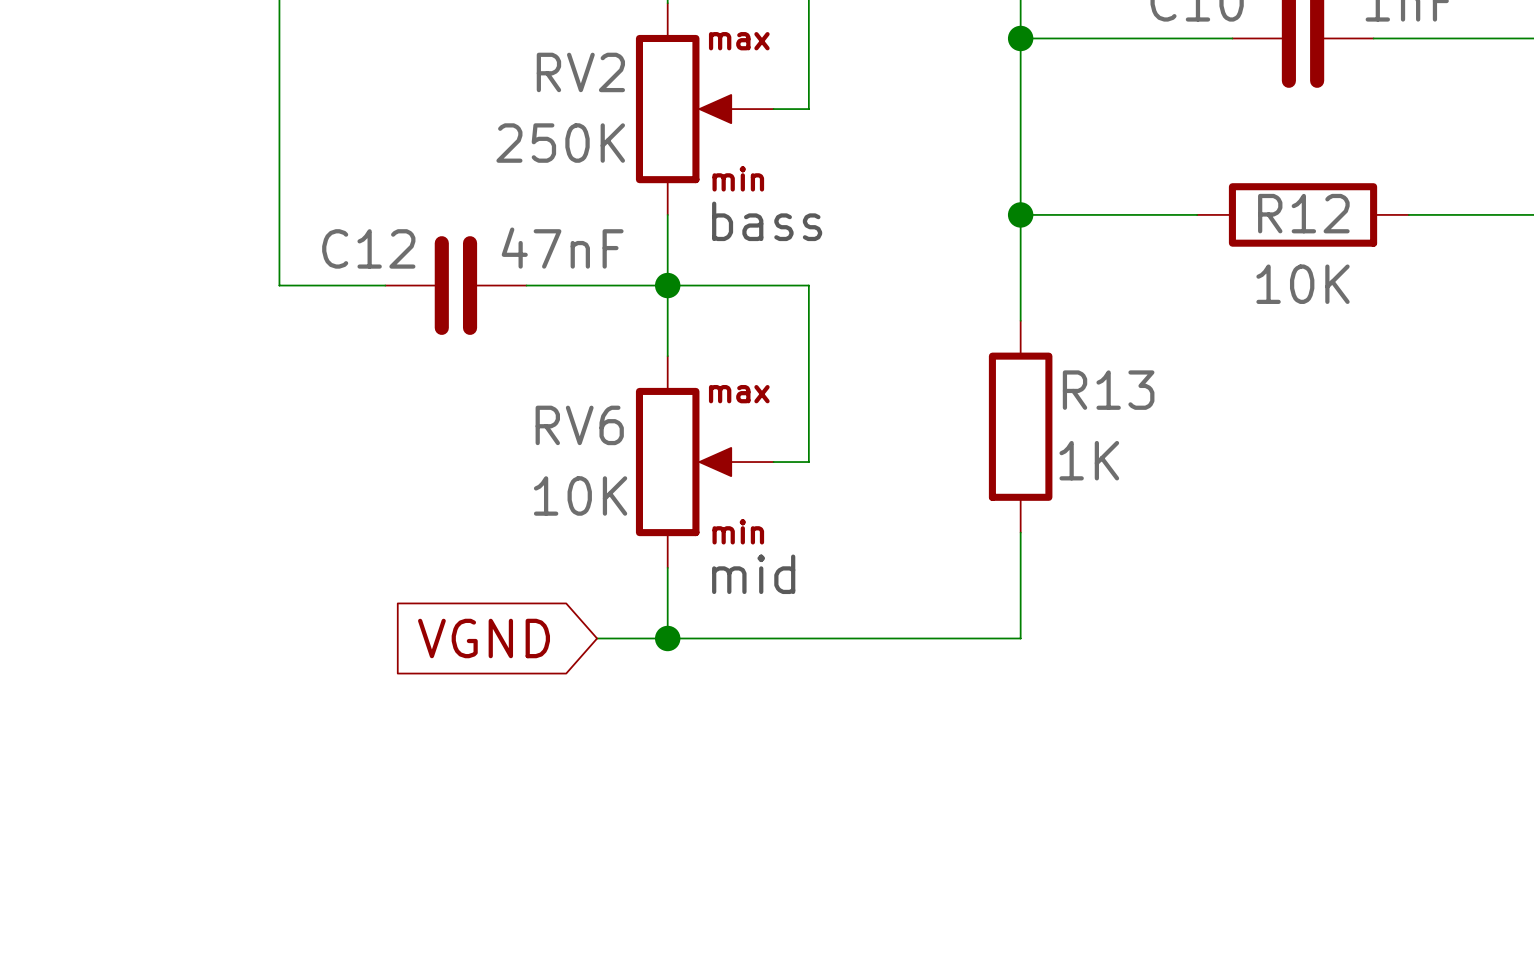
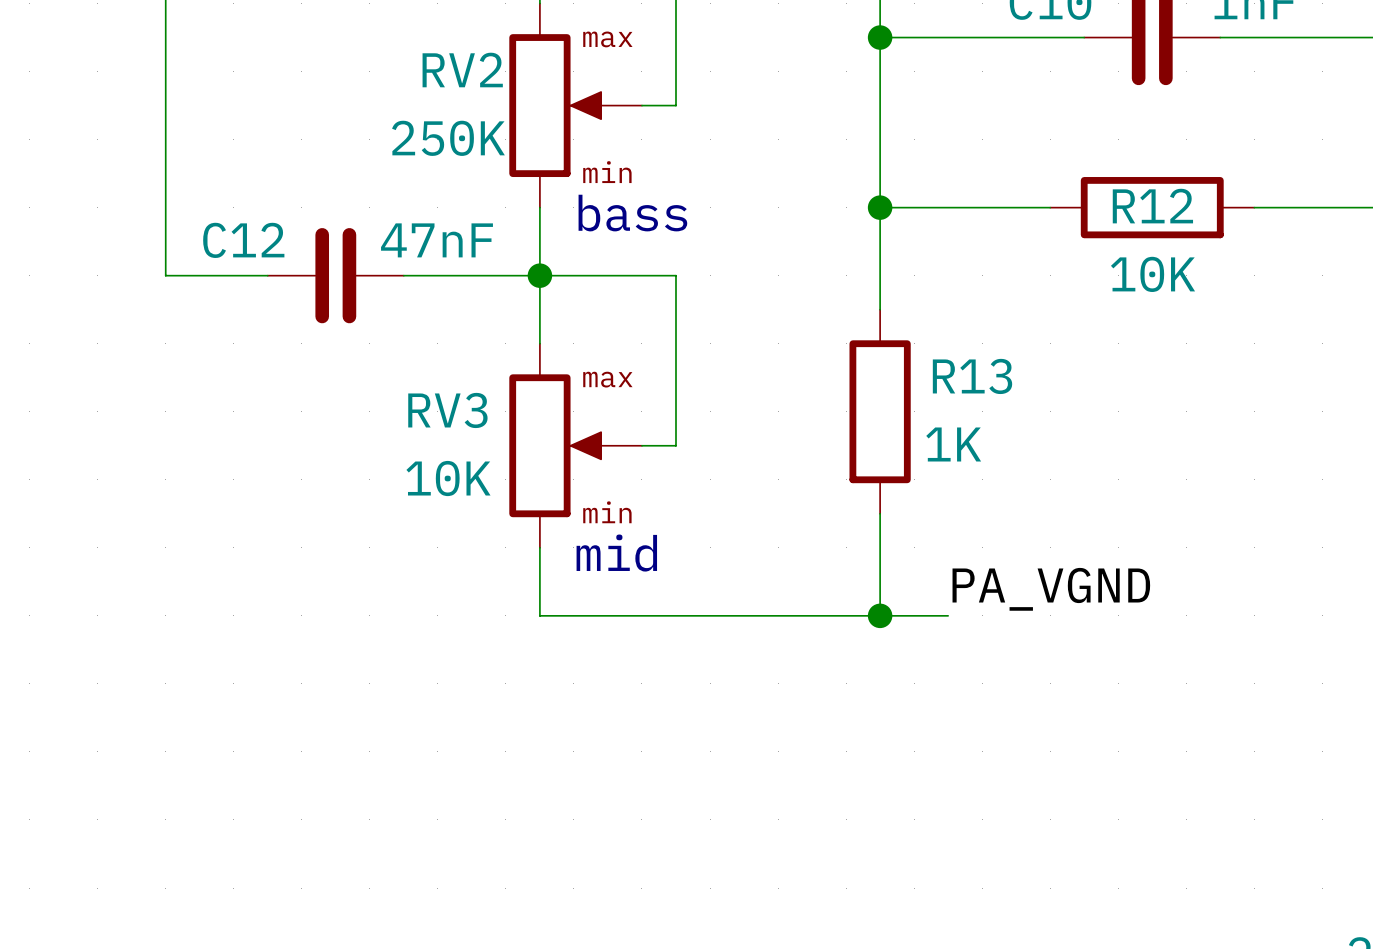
RV6 name: RV6 (579, 425) -> RV3 (447, 410)
label: none -> PA_VGND (1051, 589)
global label: VGND (484, 638) -> none
wire: (597, 638) (667, 638) -> (880, 615) (948, 615)
junction: (667, 638) -> none
junction: none -> (880, 615)

